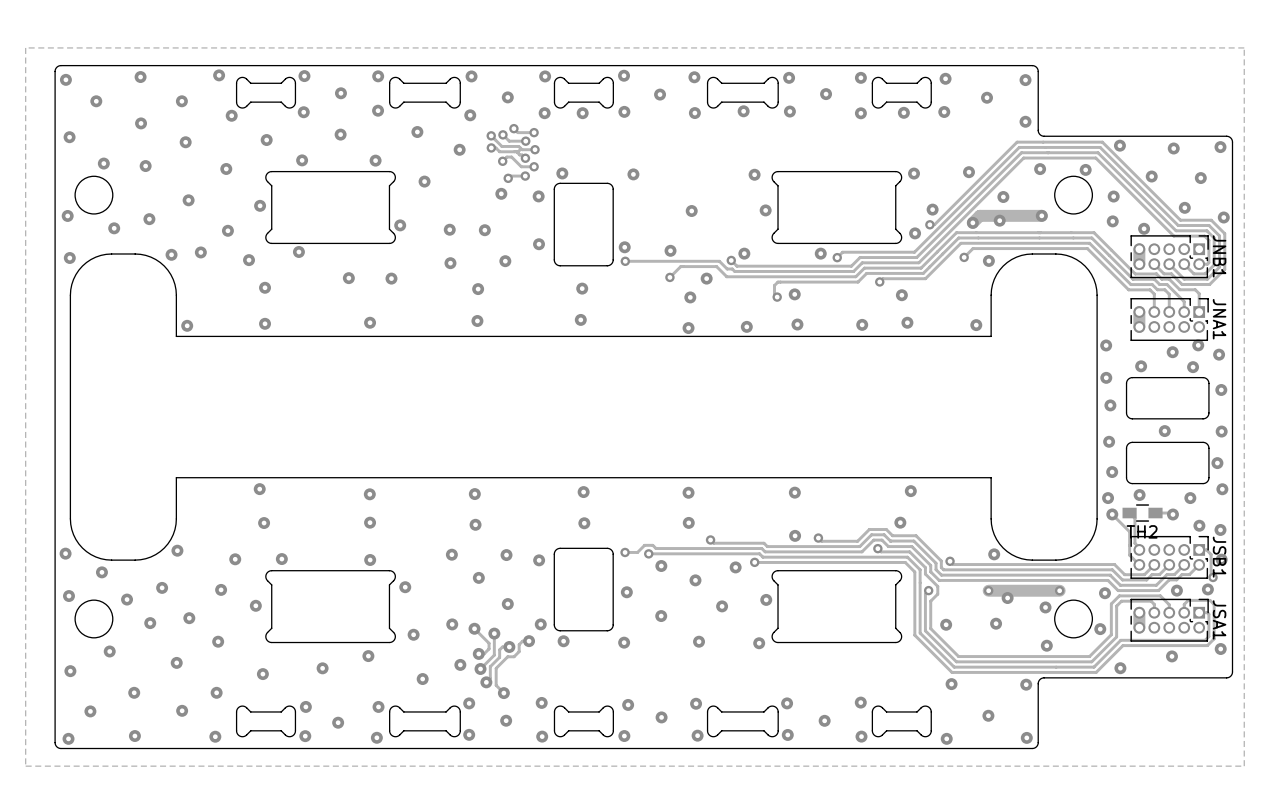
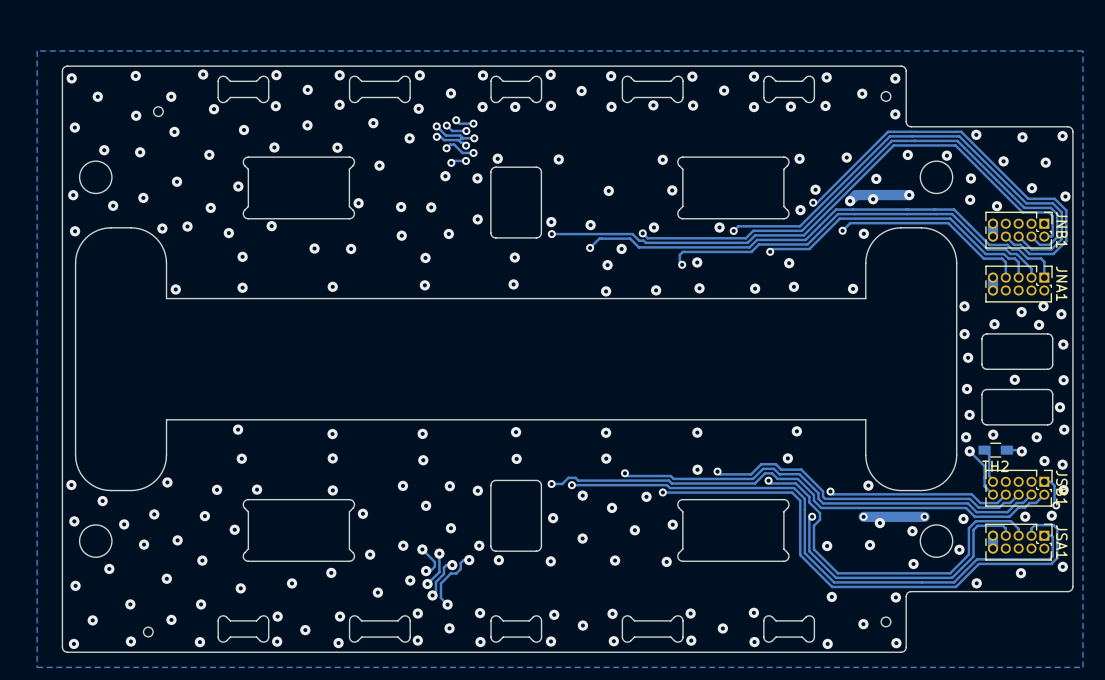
round board edge: none -> [880, 91, 892, 102]
round board edge: none -> [153, 106, 164, 117]
round board edge: none -> [880, 616, 892, 628]
round board edge: none -> [143, 626, 154, 638]

